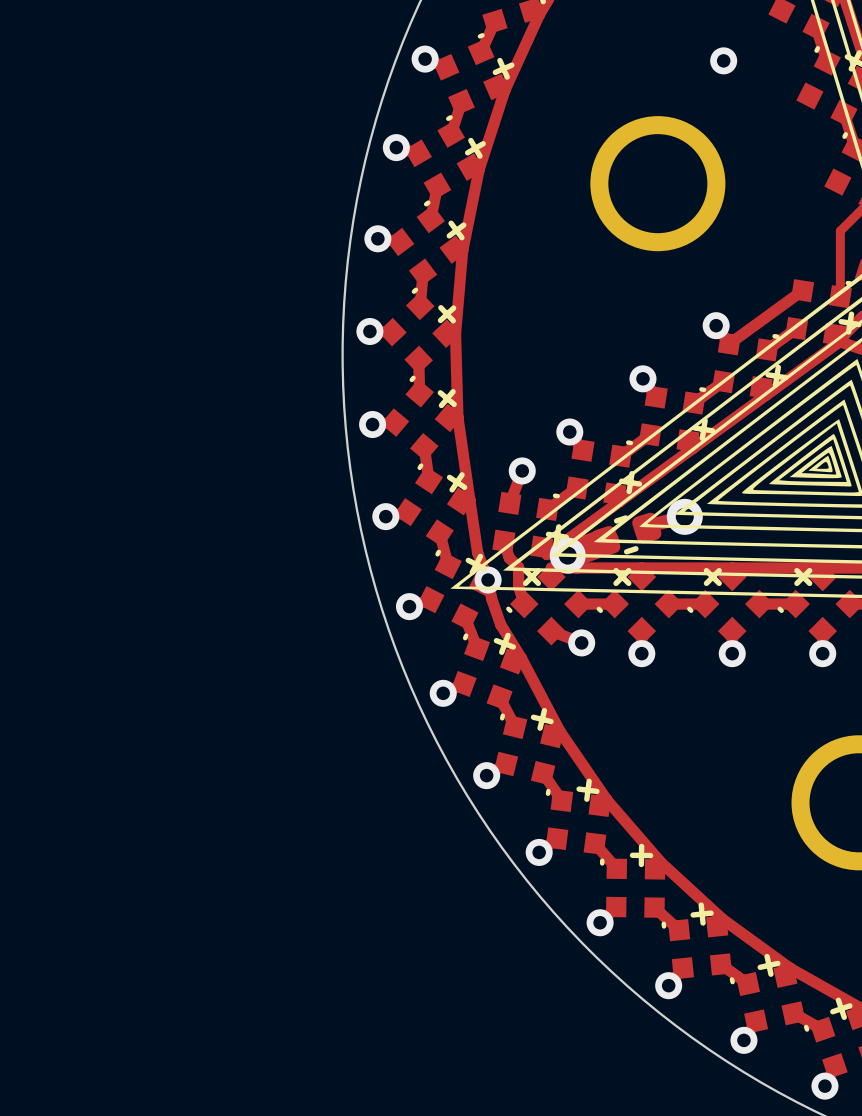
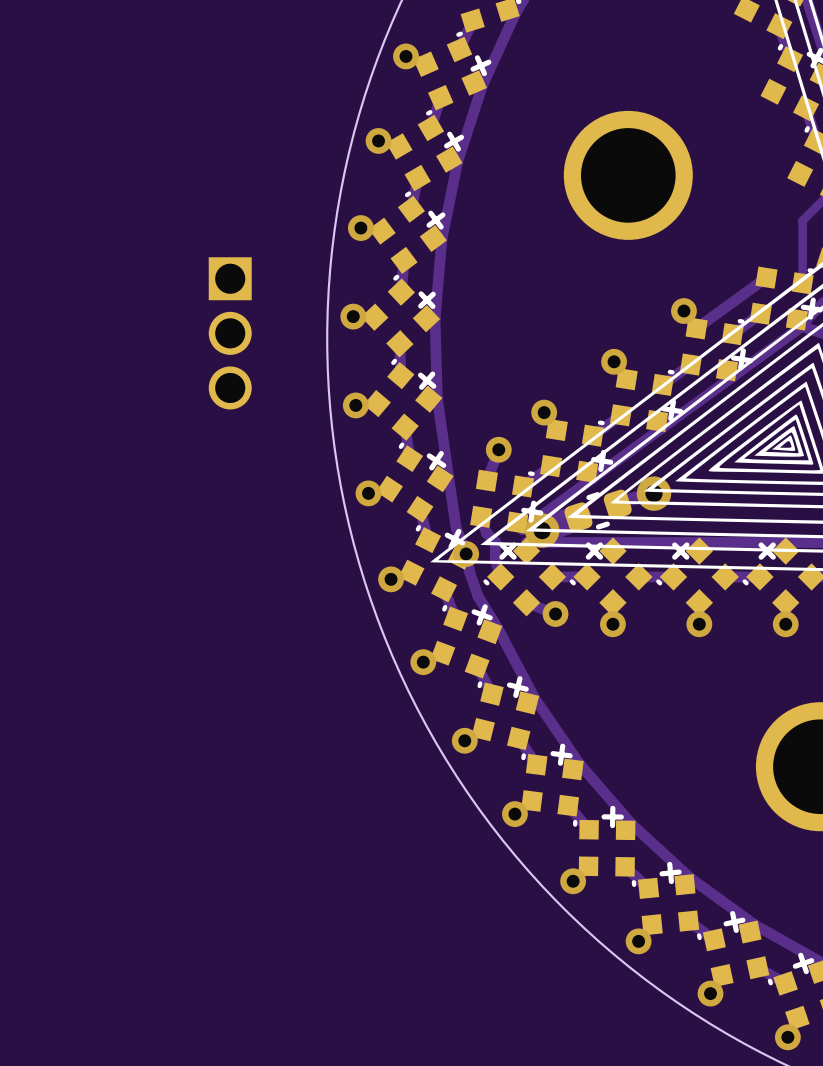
via: (723, 60) -> none
part: none -> (230, 333)

